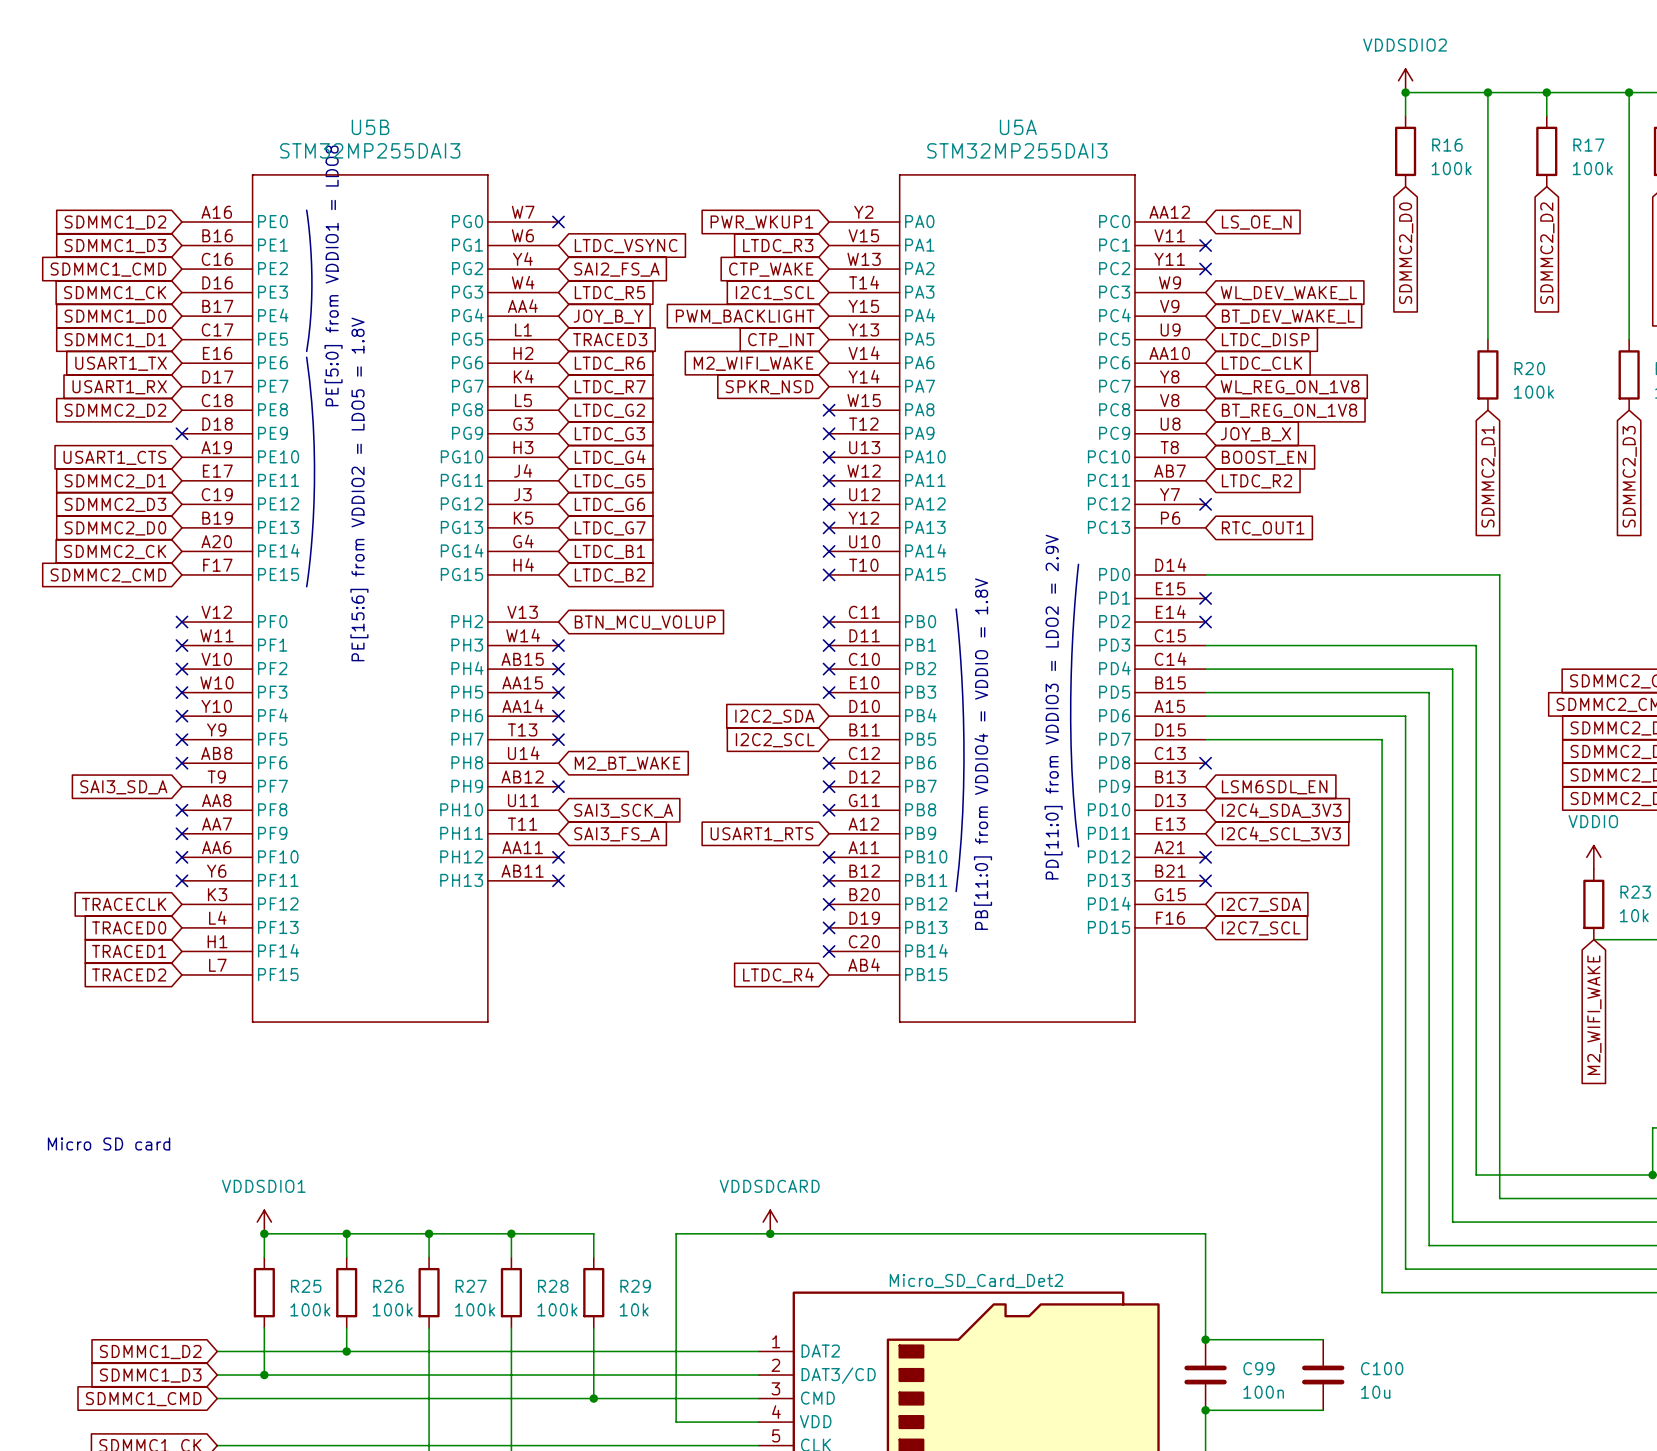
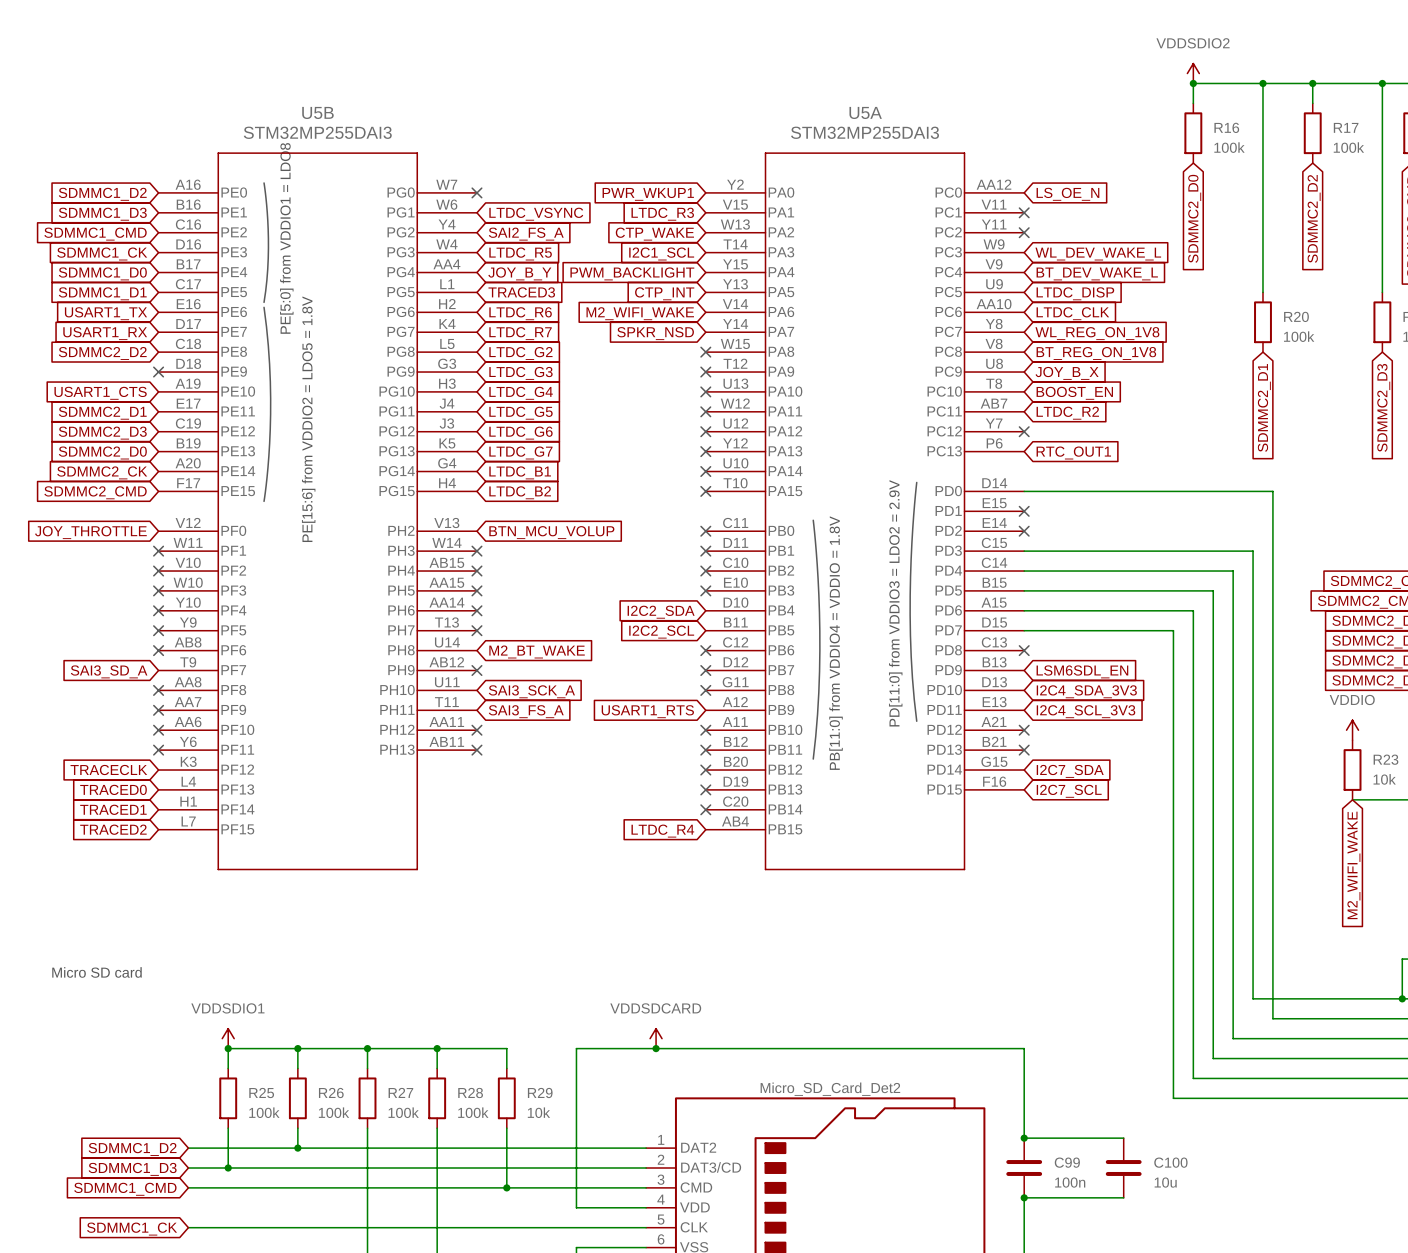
global label: none -> JOY_THROTTLE (90, 532)
no-connect mark: (181, 622) -> none

